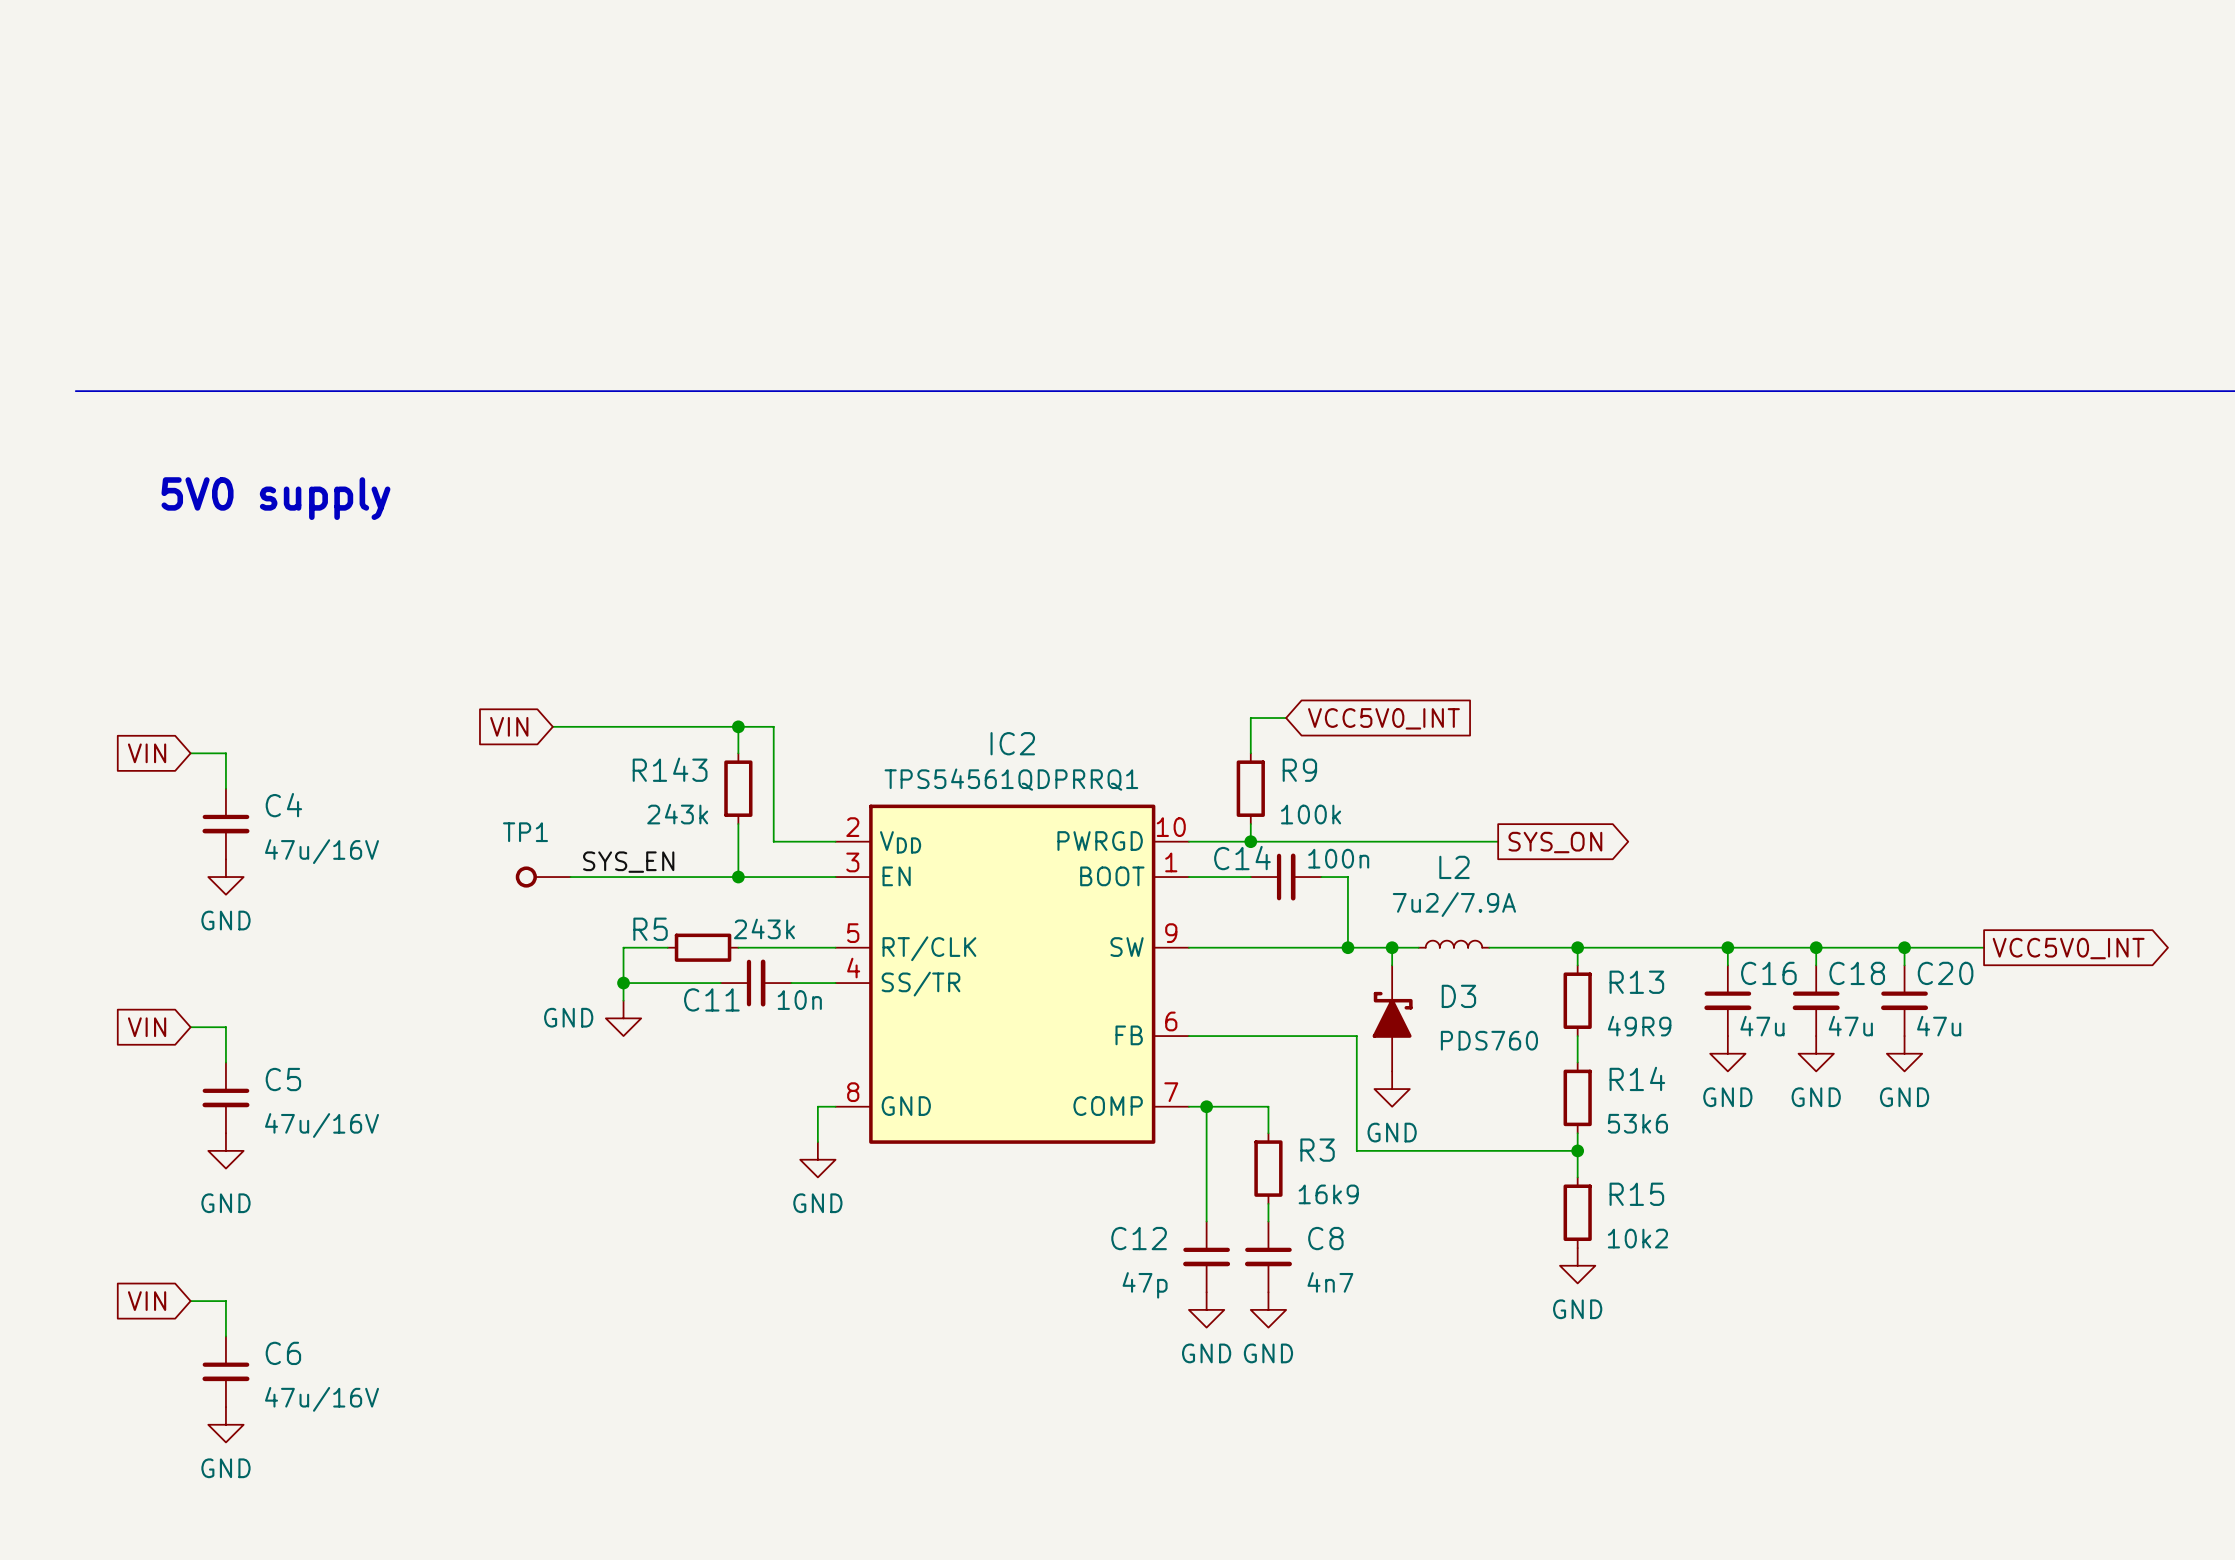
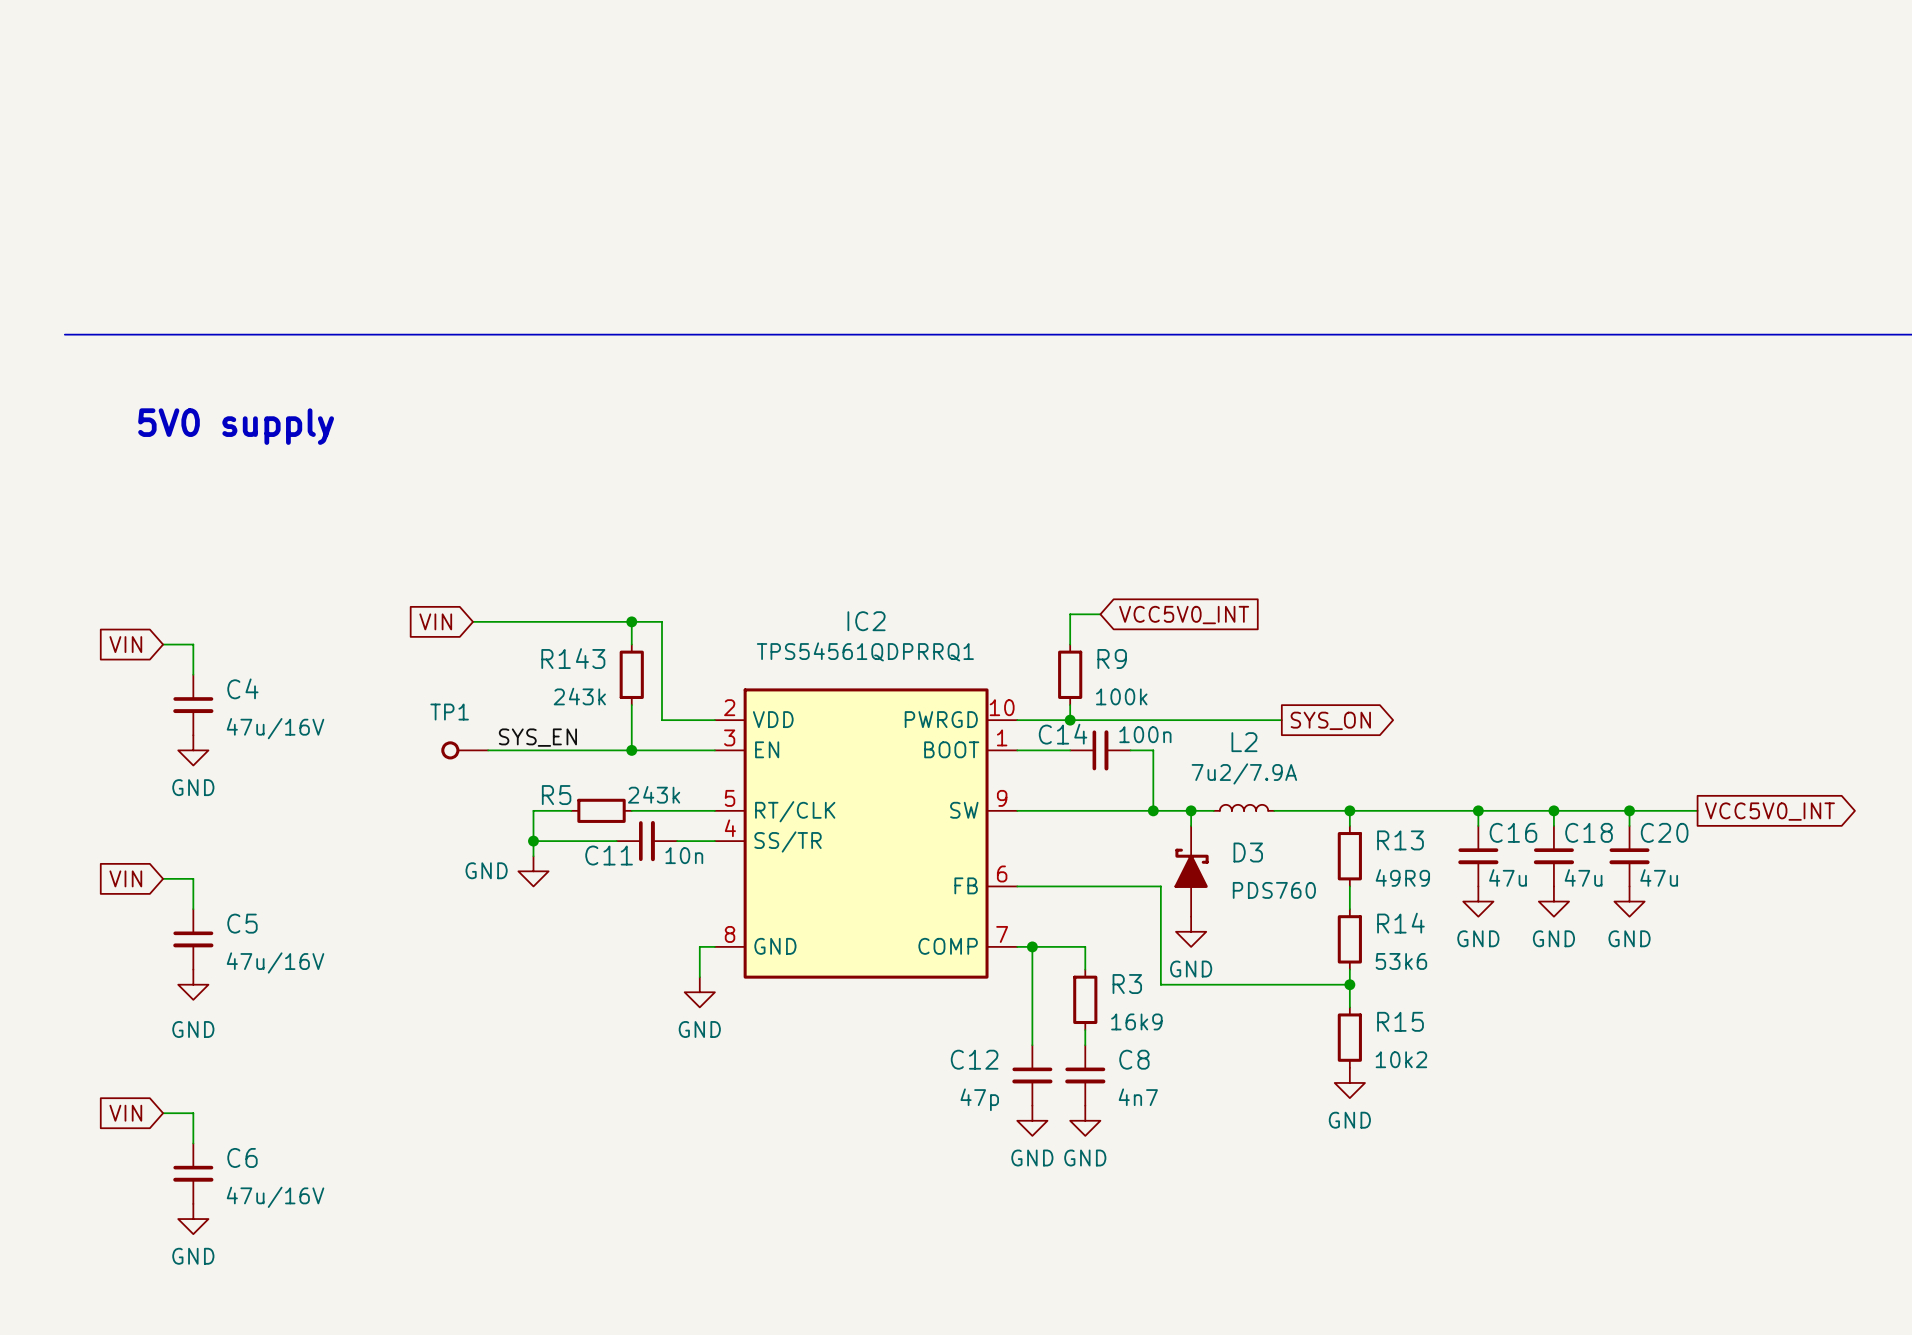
IC2 value: none -> TPS54561QDPRRQ1 (865, 651)
IC2 text: TPS54561QDPRRQ1 (1011, 779) -> none
IC2 symbol: [835, 804, 1189, 1144] -> [714, 688, 1018, 979]

